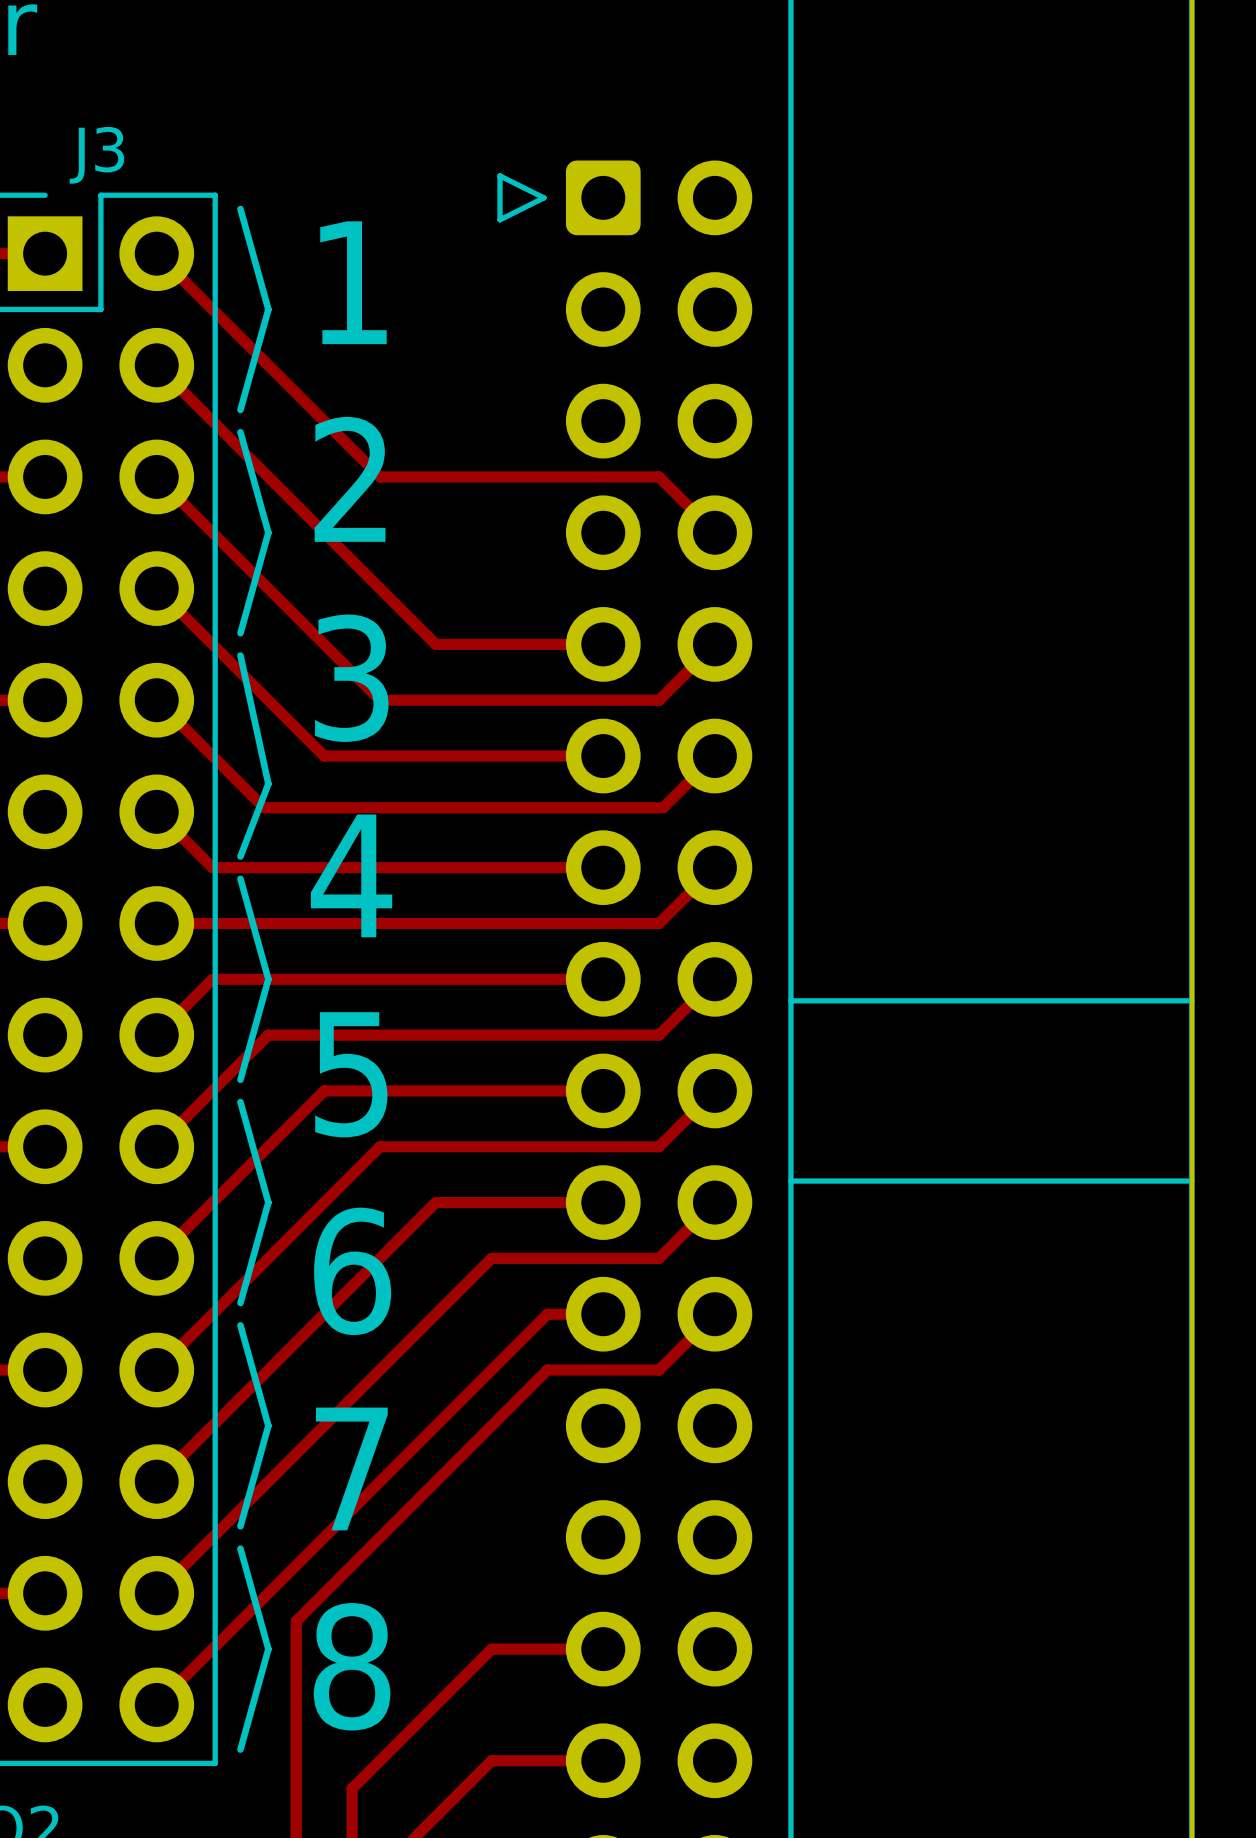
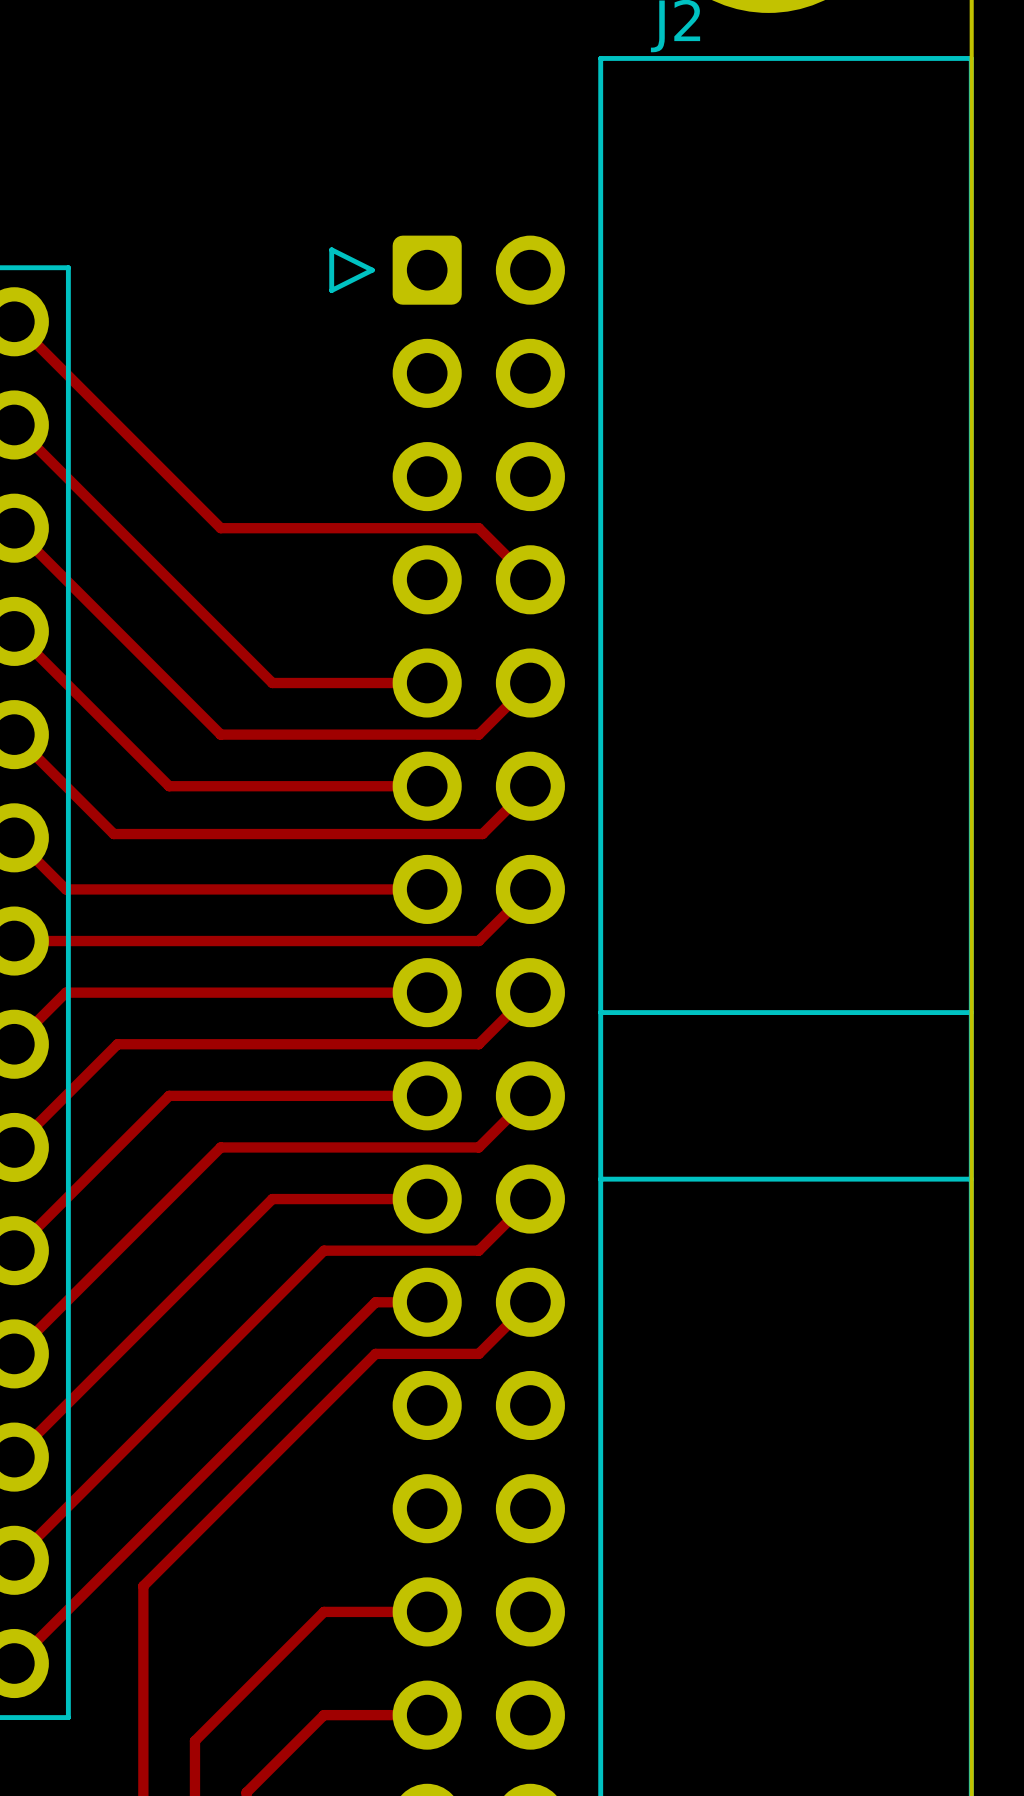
line: (240, 209) (268, 309) (240, 409) -> none
text: 1 (353, 282) -> none
line: (240, 432) (268, 532) (240, 633) -> none
text: 2 (350, 479) -> none
line: (240, 655) (268, 783) (240, 856) -> none
text: 3 (351, 678) -> none
text: 4 (351, 875) -> none
line: (240, 878) (268, 979) (240, 1079) -> none
text: 5 (351, 1074) -> none
line: (240, 1102) (268, 1202) (240, 1303) -> none
text: 6 (352, 1271) -> none
line: (240, 1325) (268, 1425) (240, 1526) -> none
text: 7 (351, 1468) -> none
line: (240, 1548) (268, 1649) (240, 1749) -> none
text: 8 (352, 1666) -> none

